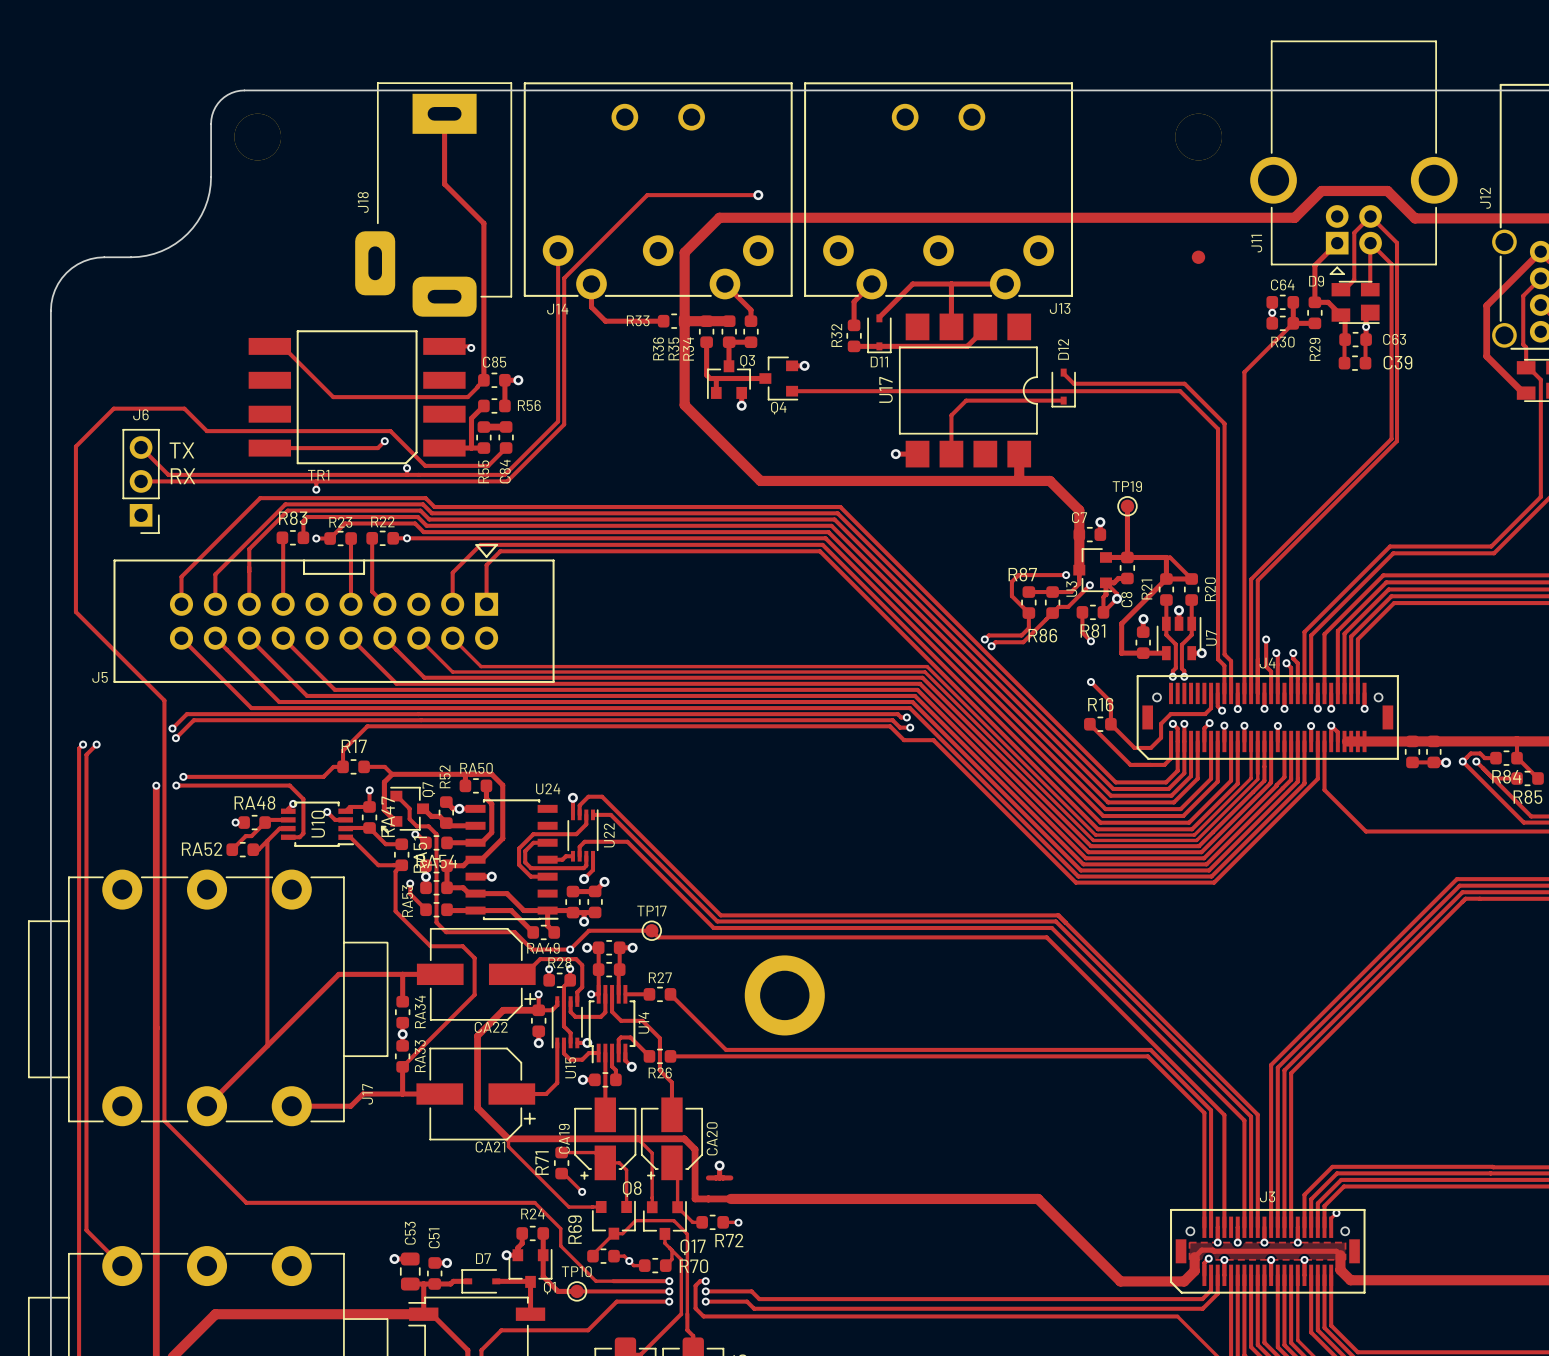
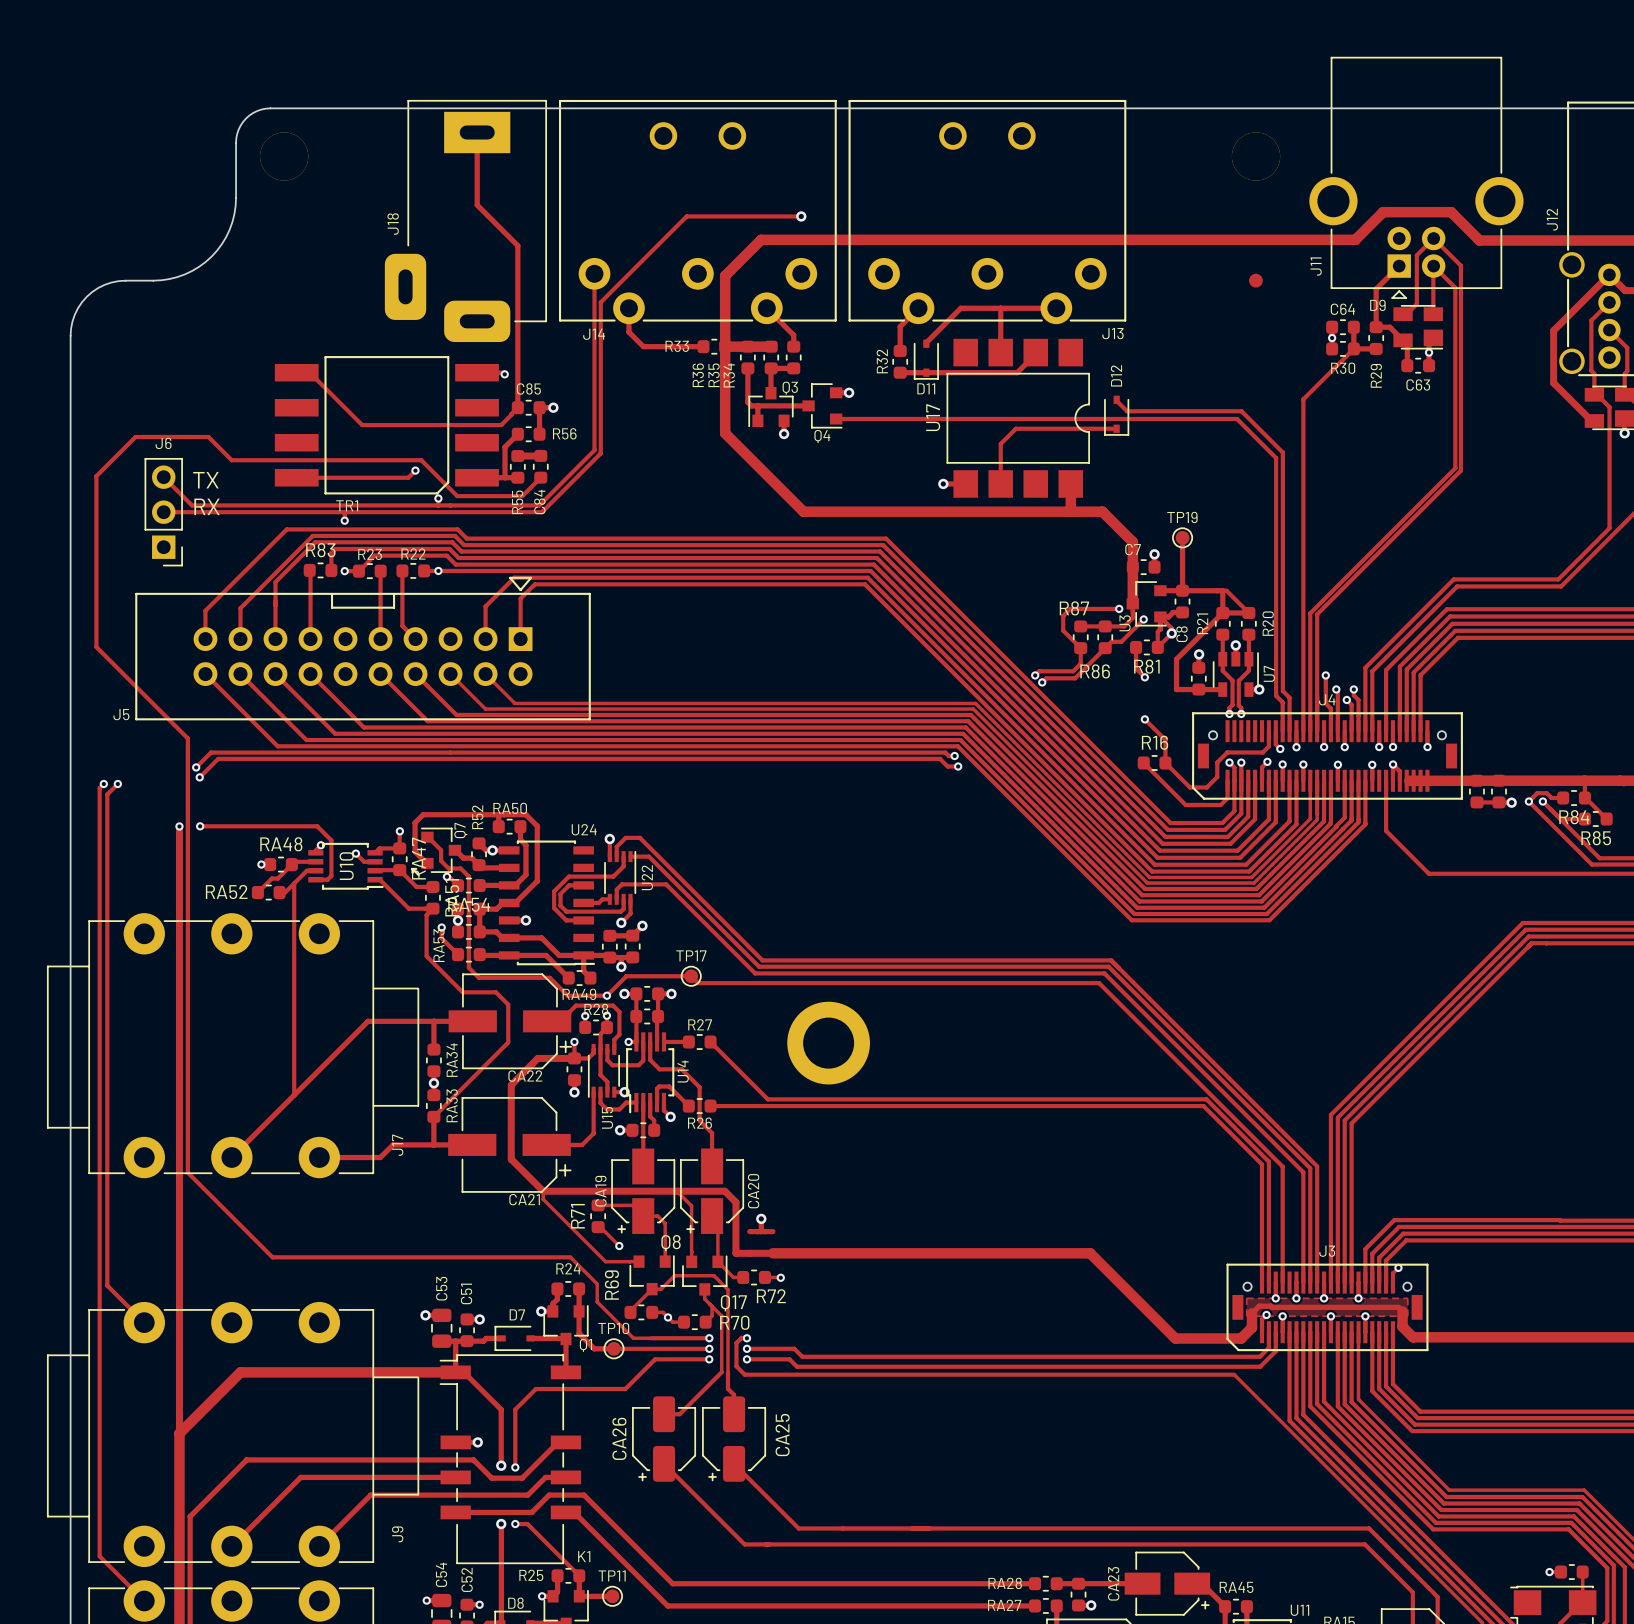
track: (1345, 339) (1344, 363) -> none
track: (1366, 339) (1365, 363) -> none
C63 name position: C63 (1394, 339) -> C63 (1418, 385)
C39: (1355, 363) -> none
track: (1317, 741) (1317, 778) (1214, 882) (1075, 882) (933, 740) (904, 740) (890, 726) (367, 726) (343, 750) (343, 766) (333, 766) (323, 776) (183, 776) -> none
R17: (353, 766) -> none
track: (364, 766) (384, 766) (392, 774) -> none
via: (183, 776) -> none

